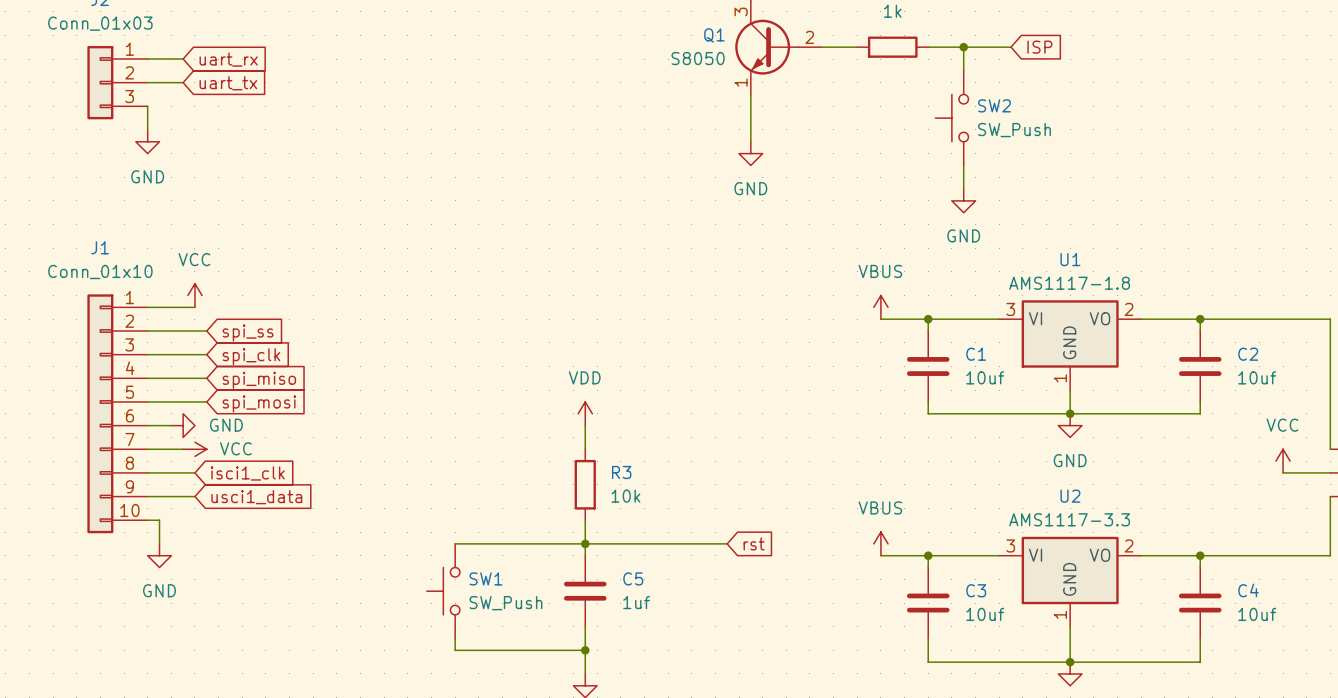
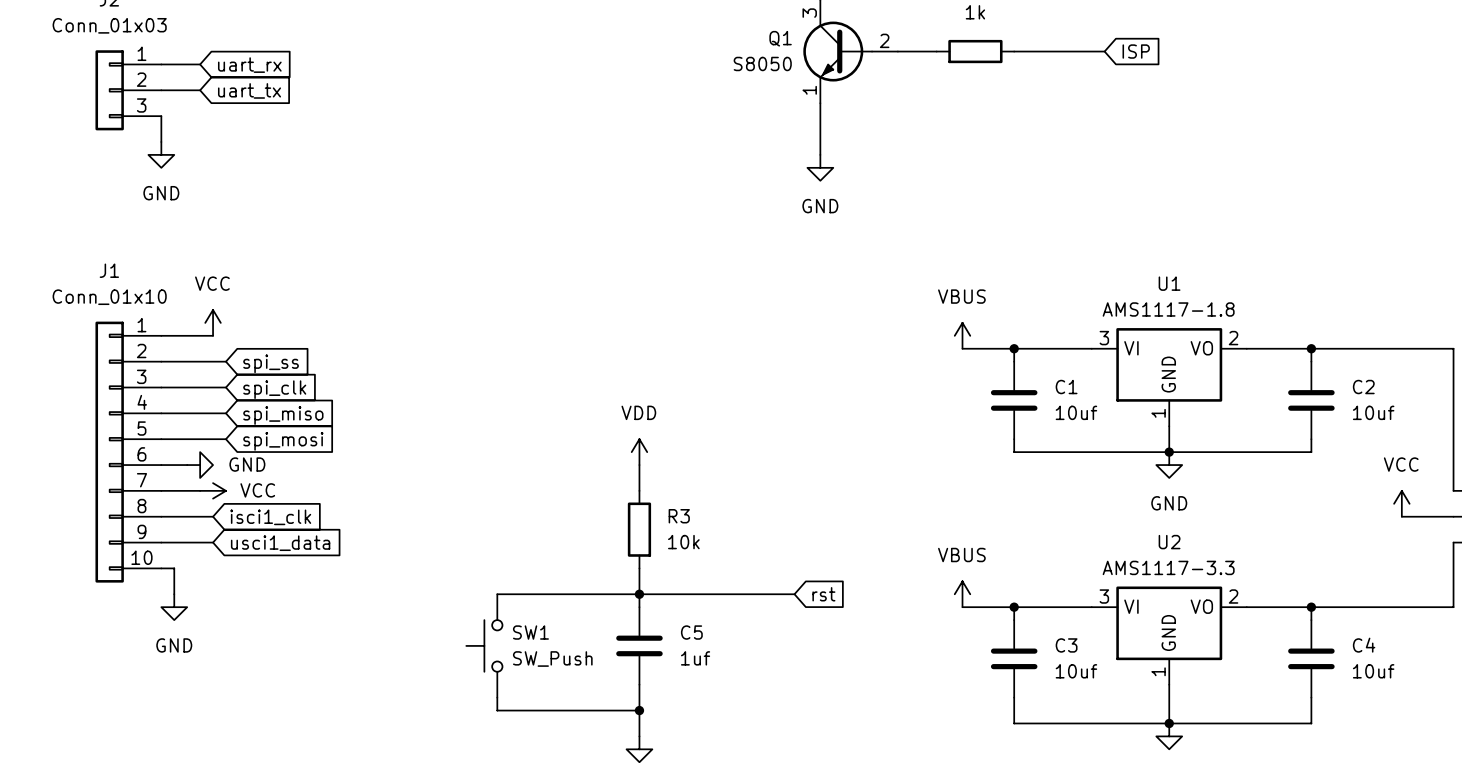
wire: (963, 47) (963, 70) -> none
junction: (963, 47) -> none
SW2: SW_Push (951, 118) -> none
wire: (963, 165) (963, 189) -> none
power symbol: GND (963, 200) -> none

